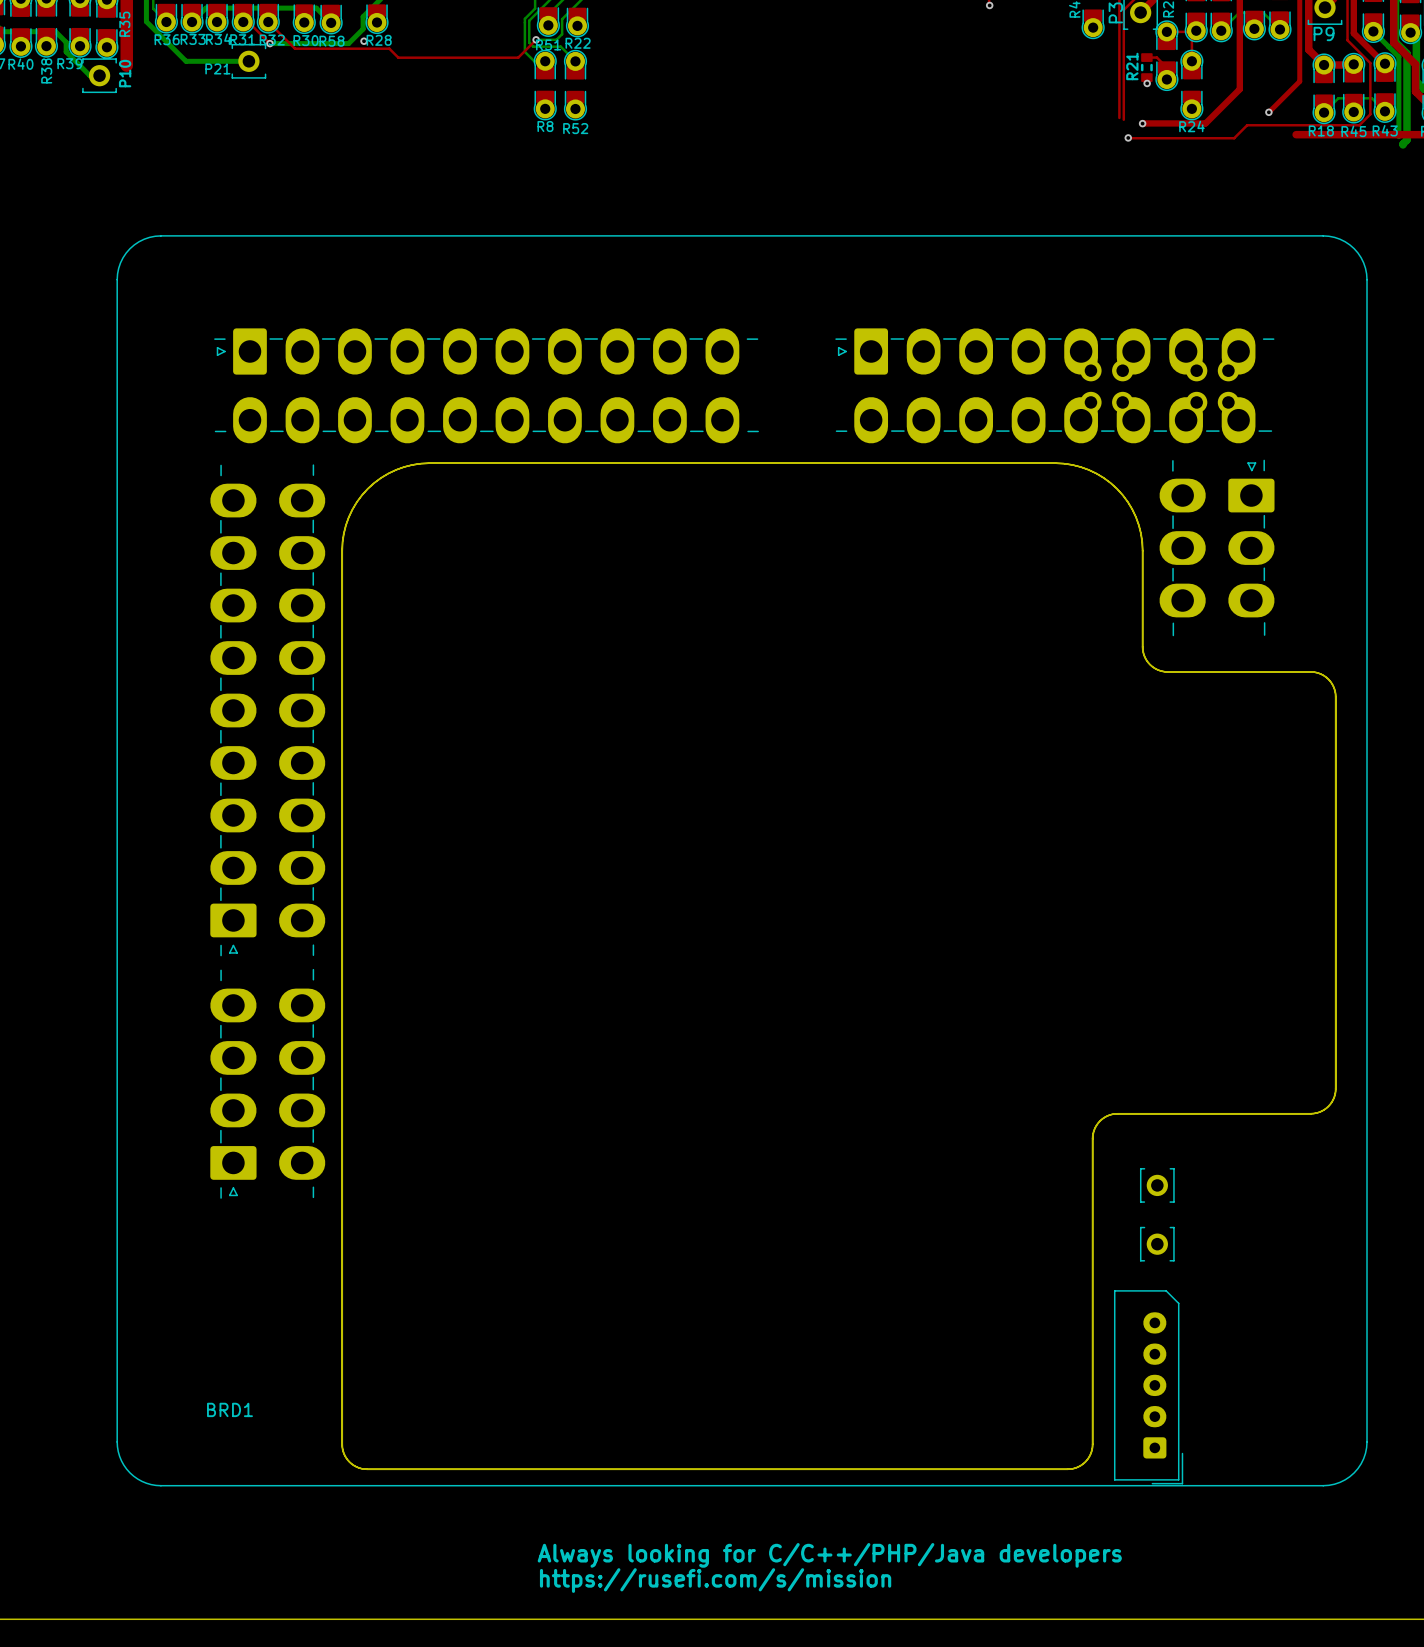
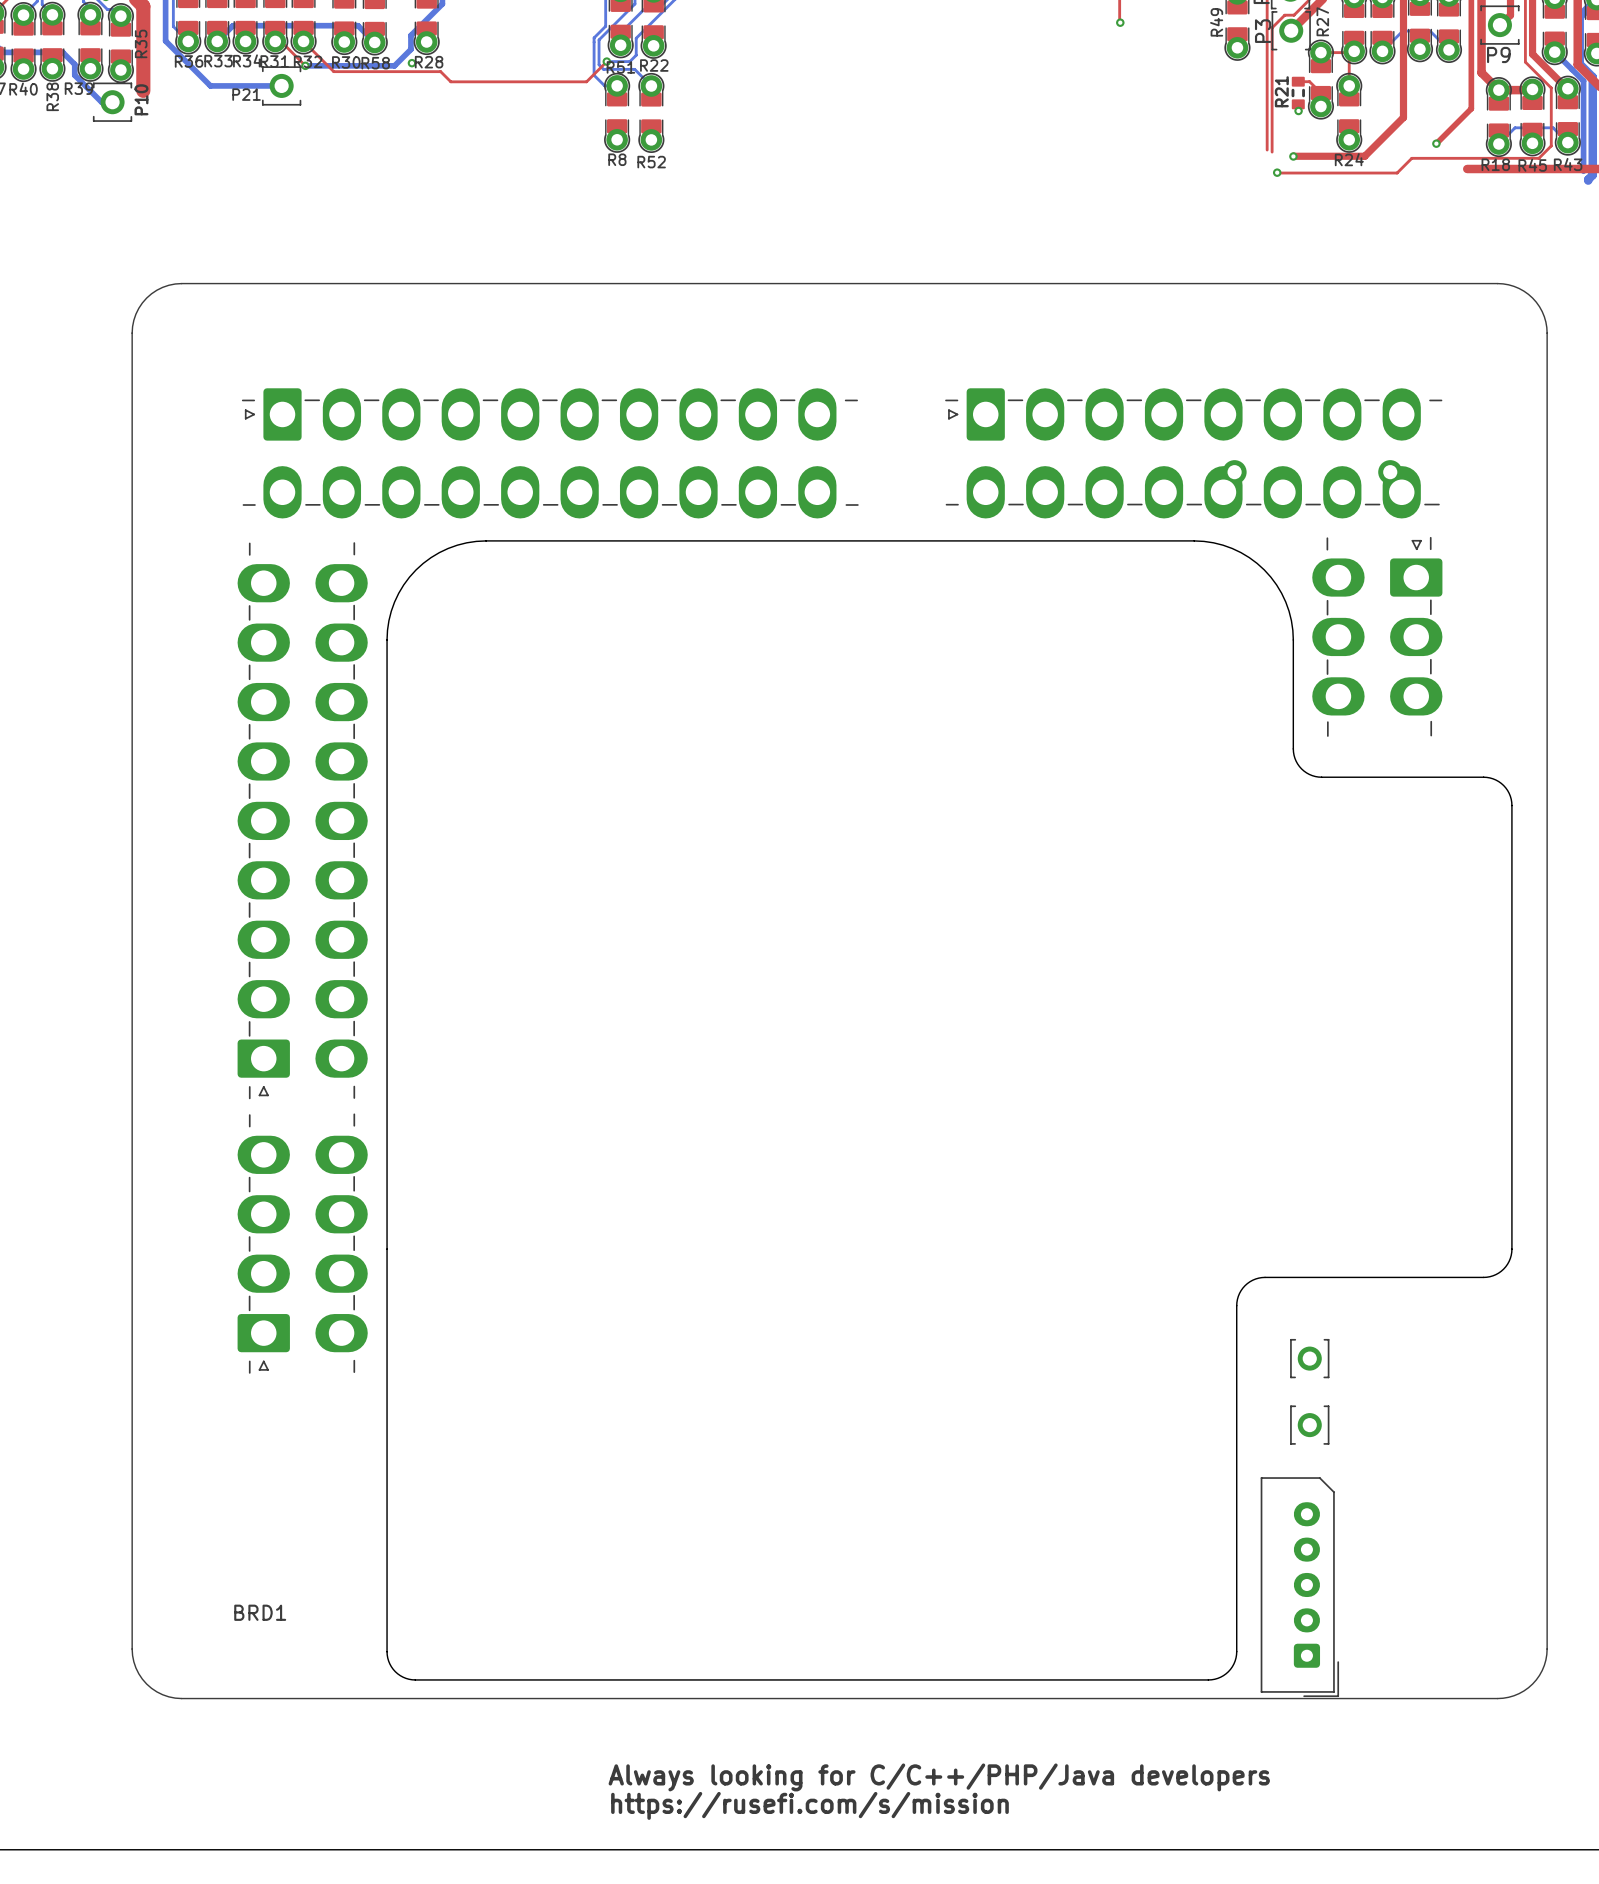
BRD1 footprint: [116, 235, 1368, 1487] -> [131, 282, 1548, 1700]
part: none -> (1234, 472)
part: none -> (1390, 472)

